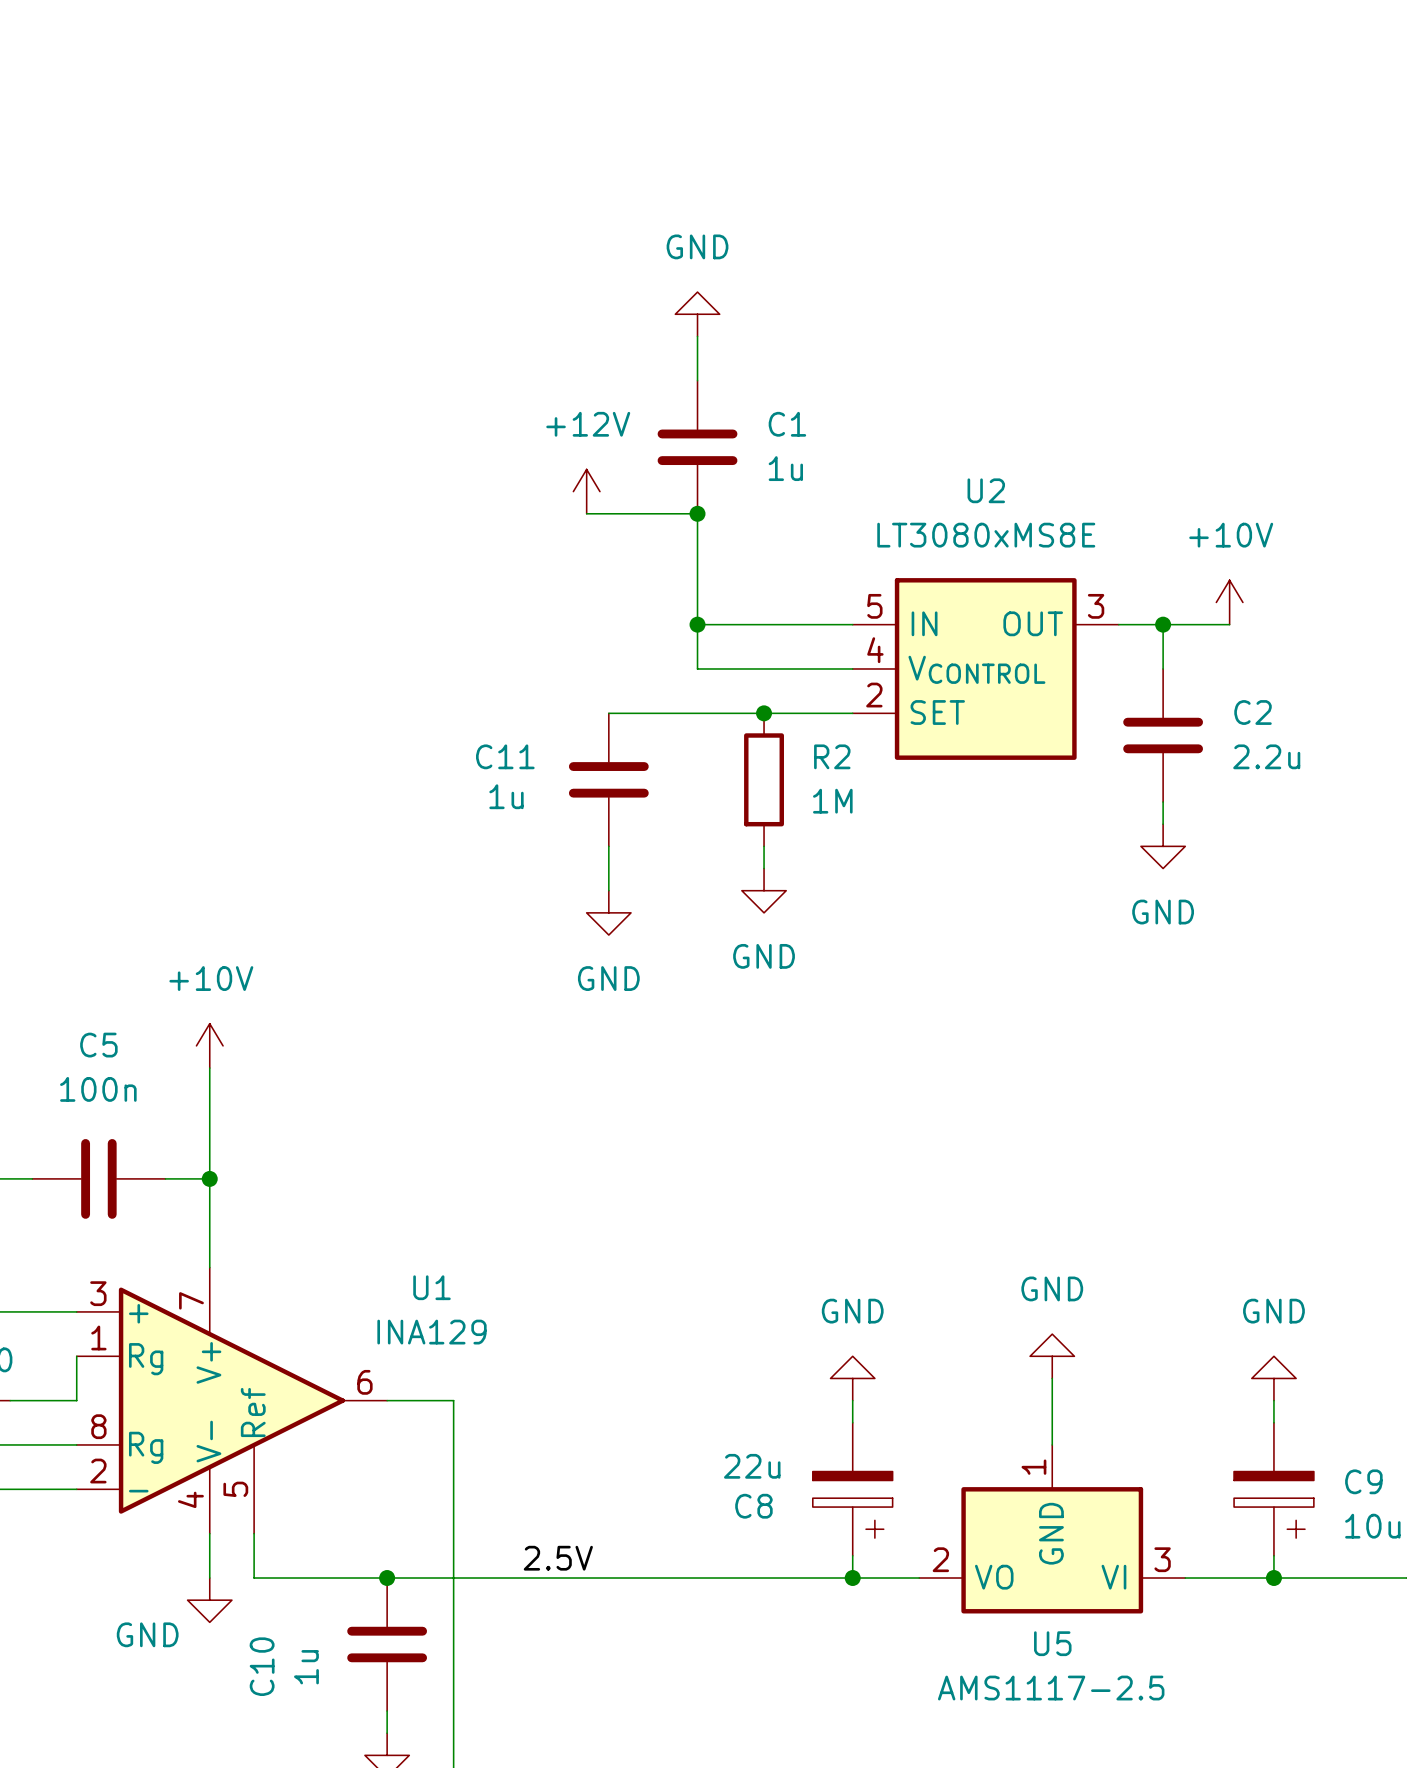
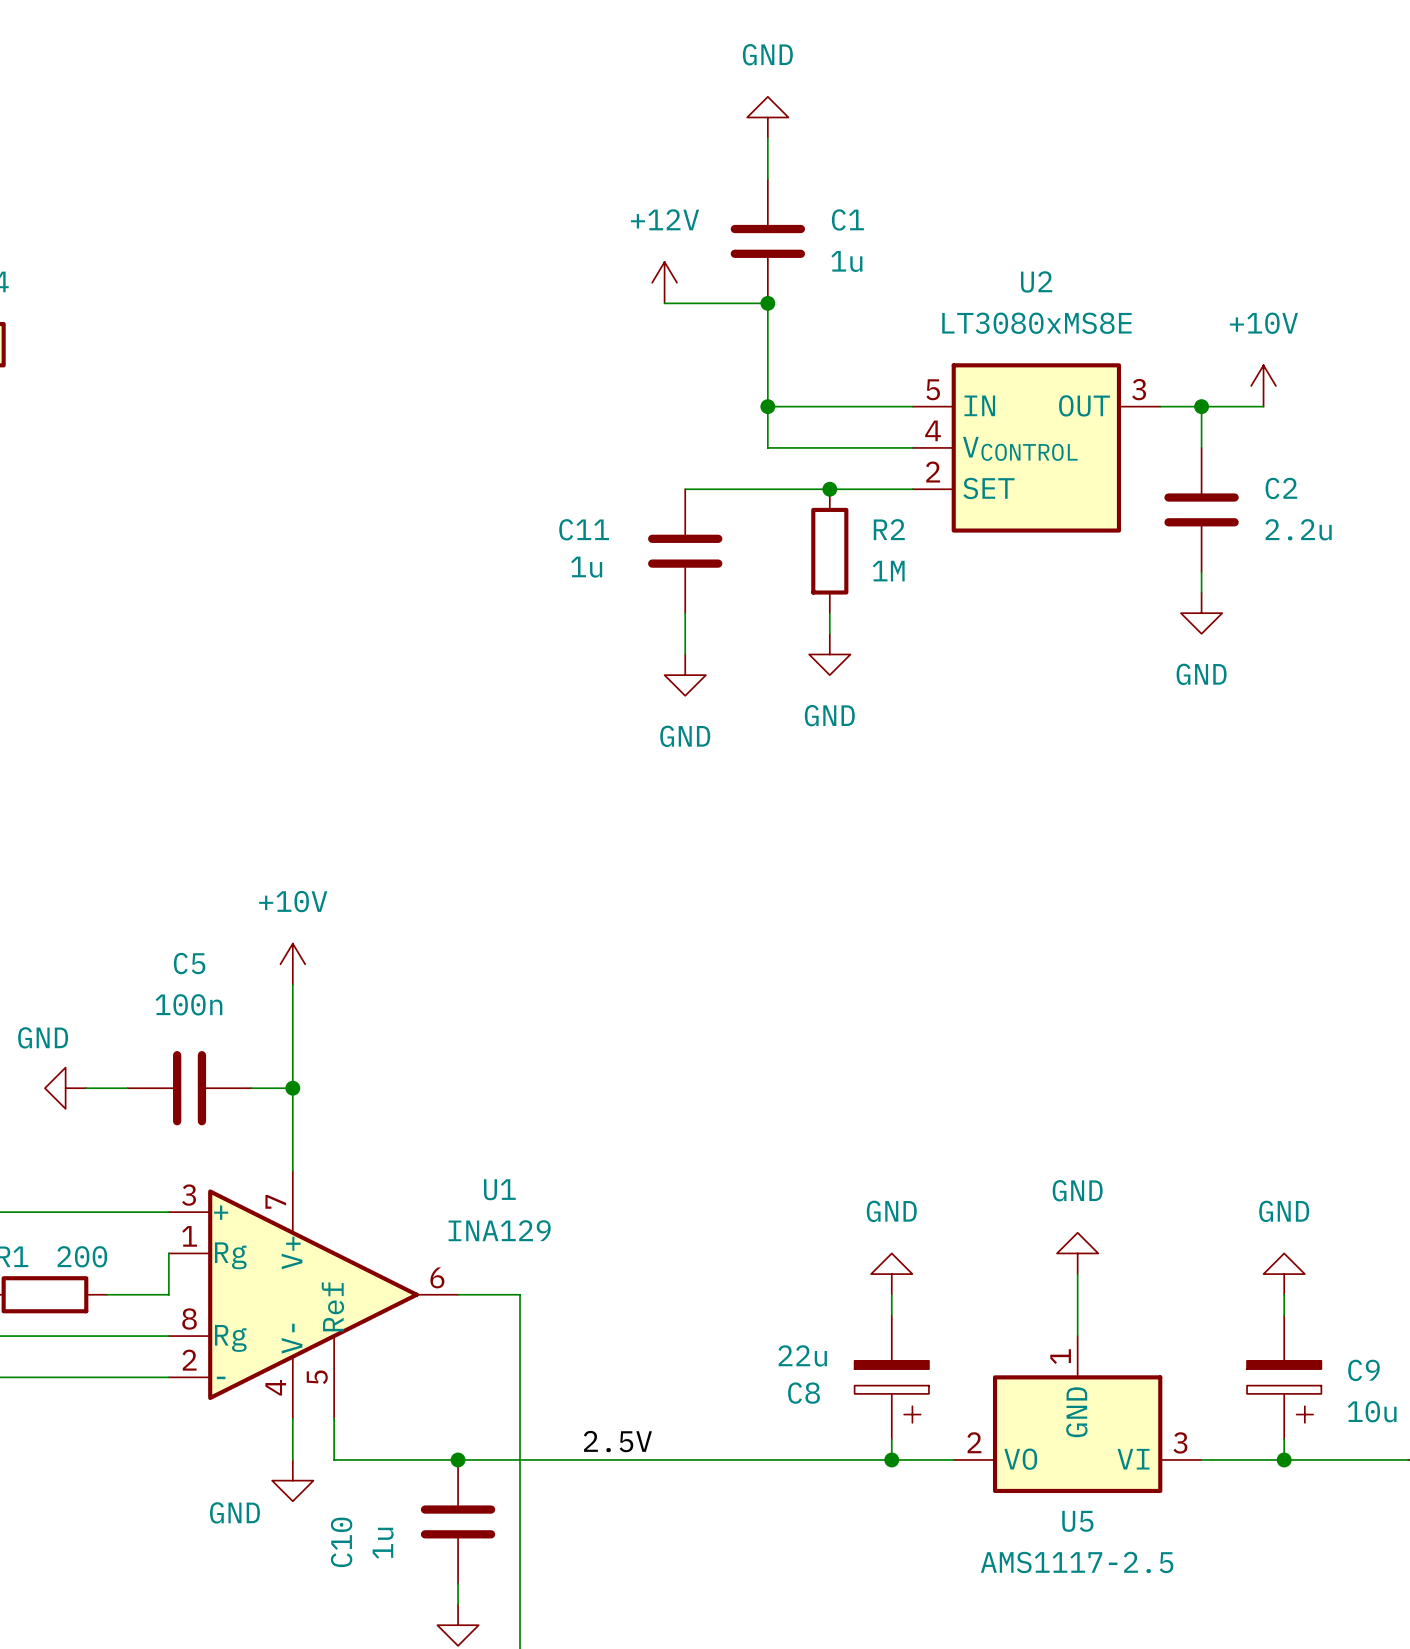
power symbol position: GND (697, 314) -> GND (767, 117)
wire: (697, 336) (697, 380) -> (767, 138) (767, 179)
junction: none -> (767, 303)
C1 position: (697, 447) -> (767, 241)
junction: none -> (767, 406)
junction: none -> (1201, 406)
power symbol position: +12V (586, 491) -> +12V (664, 282)
wire: (586, 513) (697, 513) (697, 668) (852, 668) -> (664, 303) (767, 303) (767, 447) (912, 447)
junction: (697, 513) -> none
junction: none -> (829, 489)
power symbol position: +10V (1229, 602) -> +10V (1263, 385)
wire: (697, 624) (852, 624) -> (767, 406) (912, 406)
junction: (697, 624) -> none
wire: (1118, 624) (1229, 624) -> (1160, 406) (1263, 406)
wire: (1163, 624) (1163, 668) -> (1201, 406) (1201, 447)
junction: (1163, 624) -> none
U2 position: (985, 668) -> (1036, 447)
wire: (608, 713) (852, 713) -> (685, 489) (912, 489)
junction: (764, 713) -> none
power symbol: none -> GND (829, 654)
power symbol: none -> GND (685, 675)
C2 position: (1163, 735) -> (1201, 509)
C11 position: (608, 779) -> (685, 551)
R2 position: (764, 779) -> (829, 551)
wire: (1163, 802) (1163, 824) -> (1201, 571) (1201, 592)
wire: (608, 846) (608, 890) -> (685, 613) (685, 654)
wire: (764, 846) (764, 868) -> (829, 613) (829, 633)
power symbol position: GND (1163, 846) -> GND (1201, 613)
power symbol: GND (764, 890) -> none
power symbol: GND (608, 912) -> none

